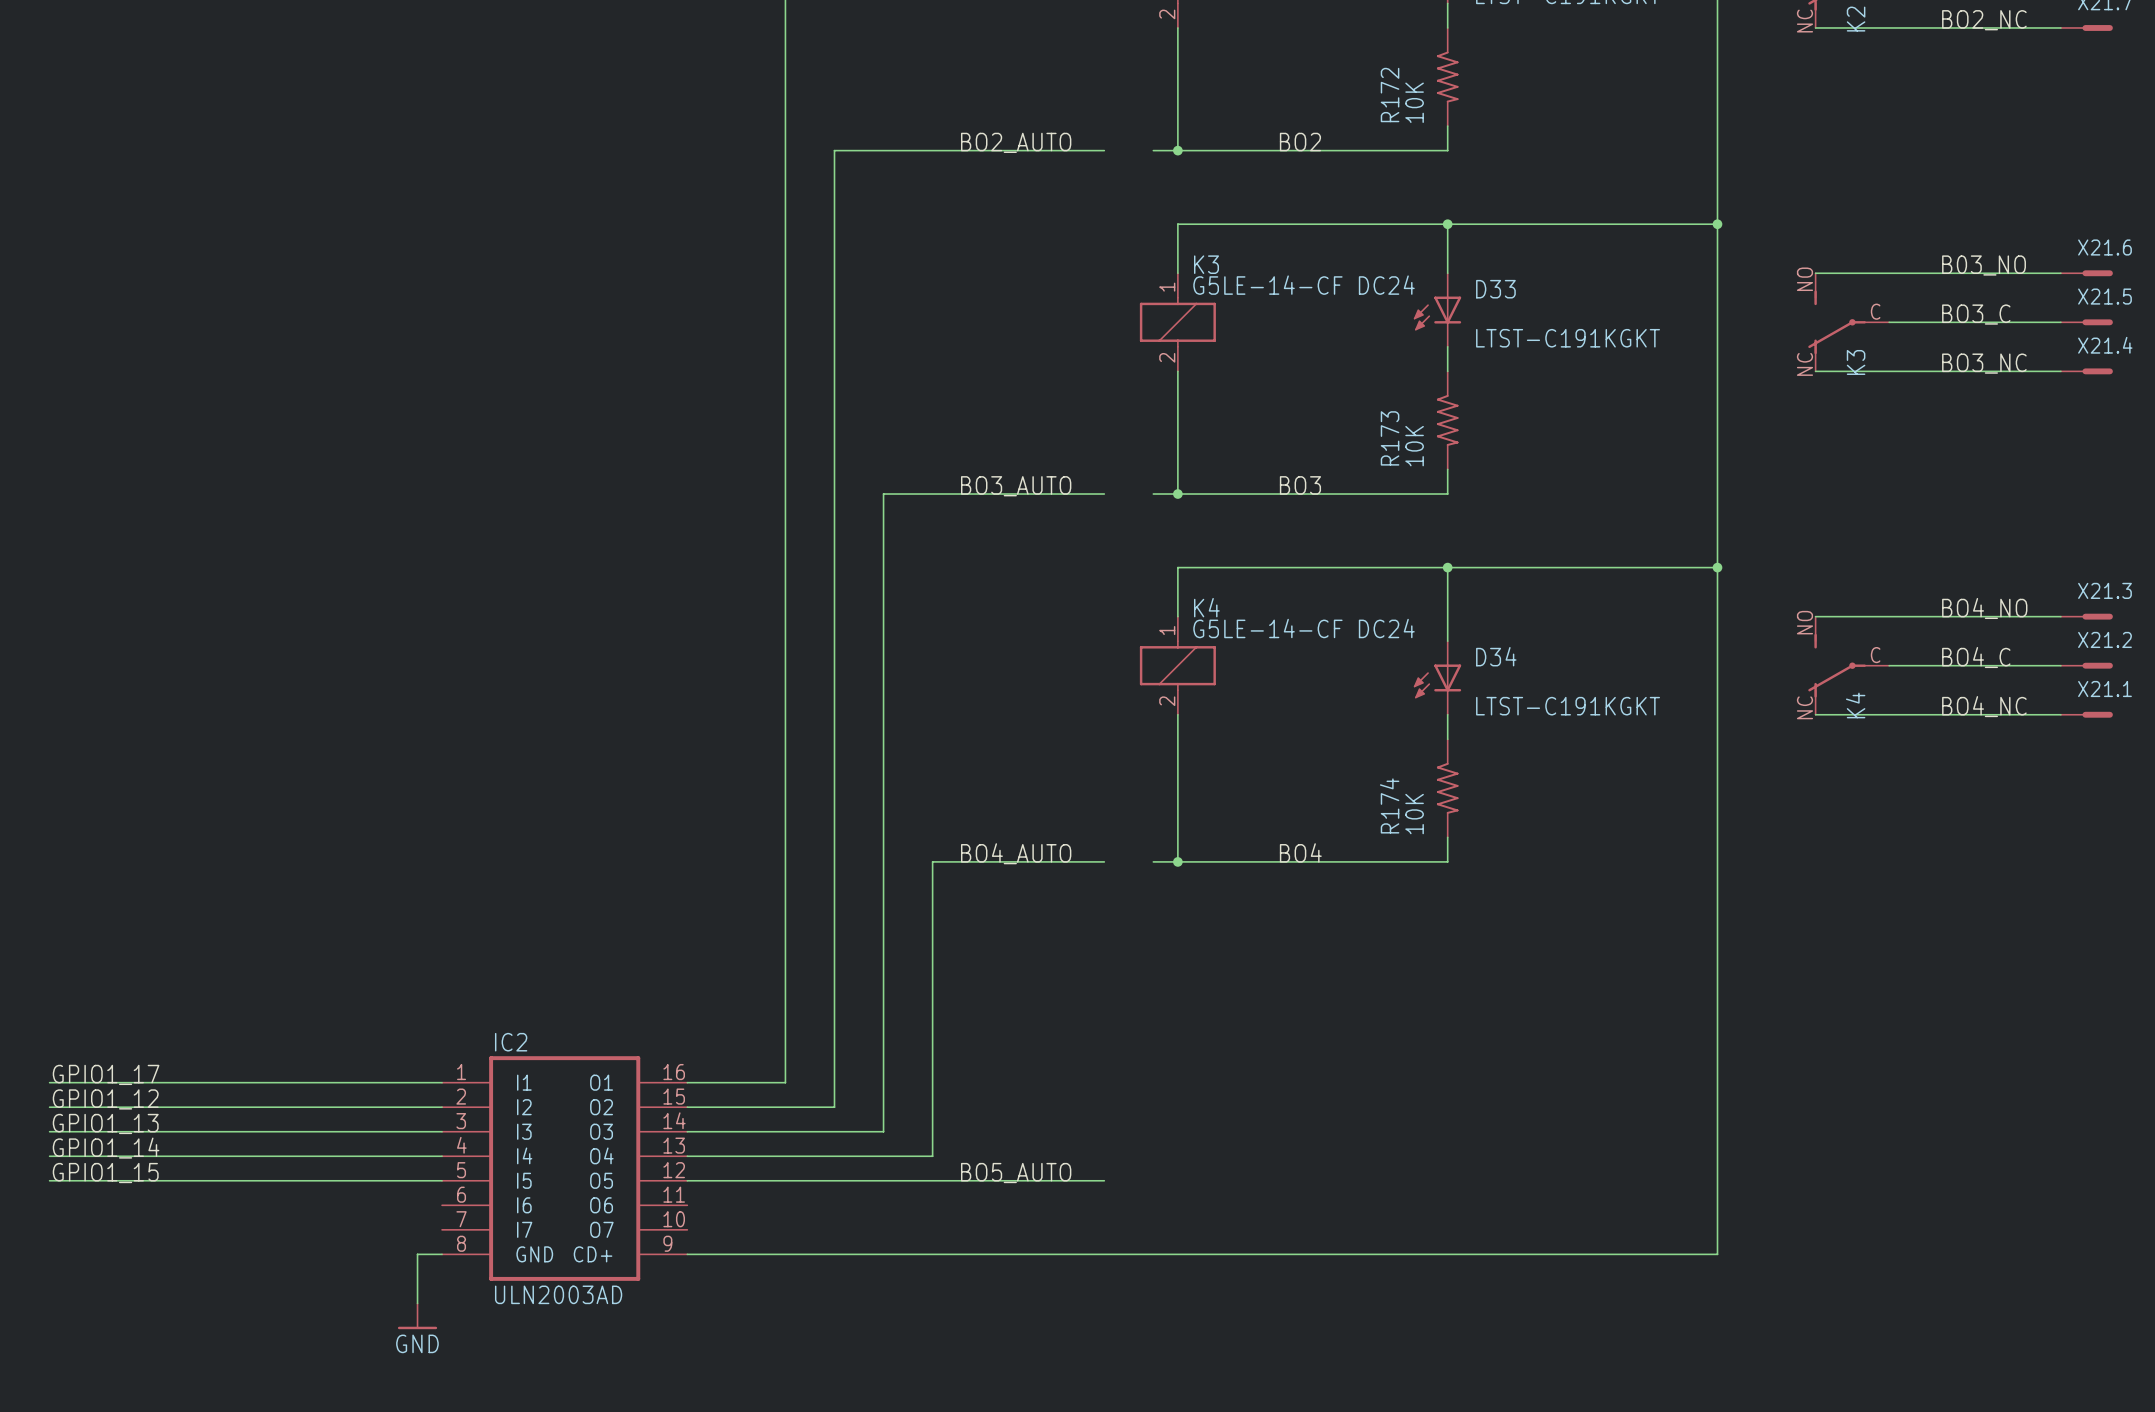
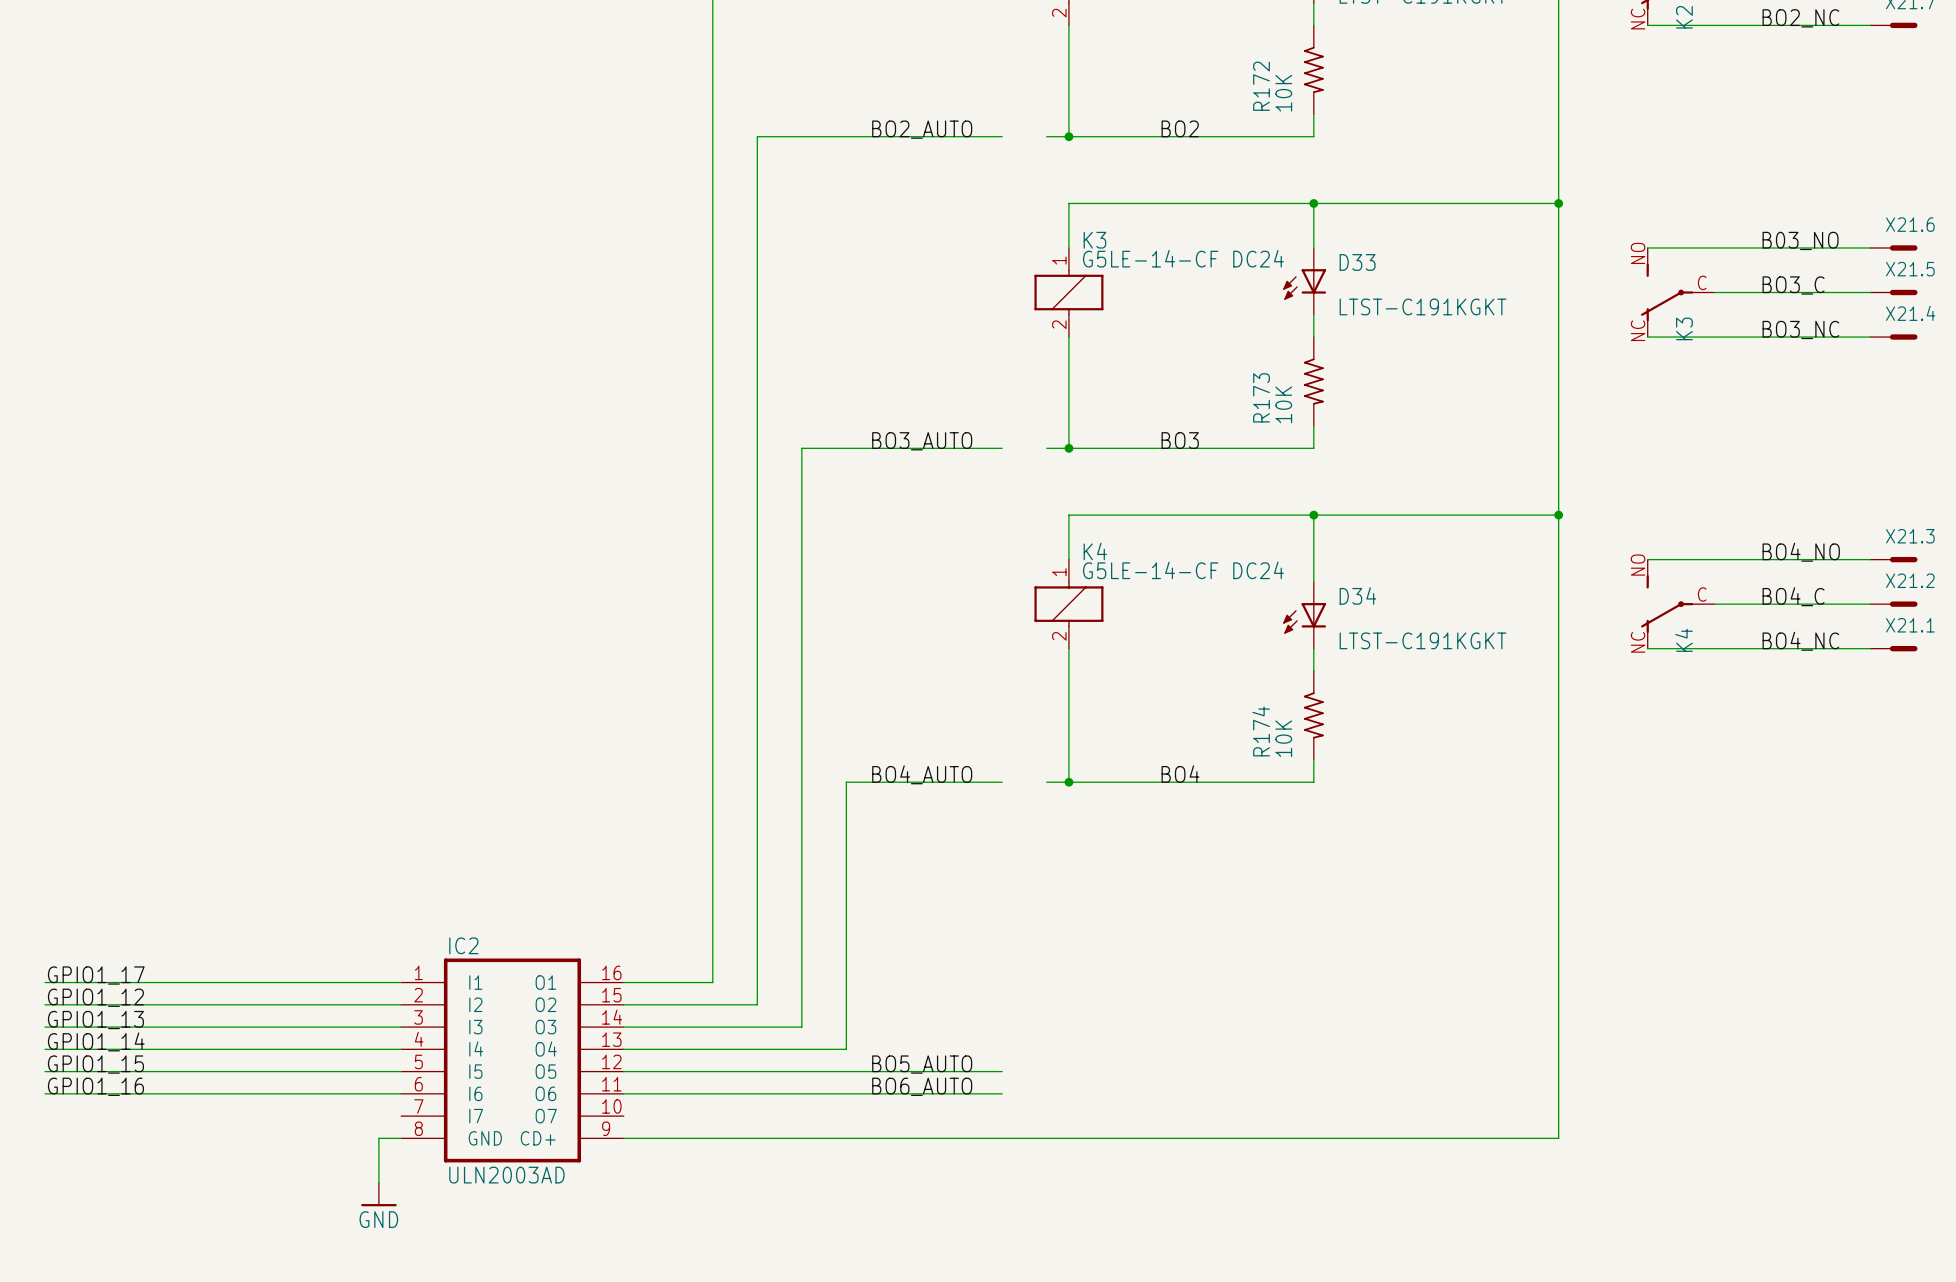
label: none -> GPIO1_16 (95, 1086)
label: none -> BO6_AUTO (922, 1086)
wire: none -> (45, 1093) (401, 1093)
wire: none -> (623, 1093) (1002, 1093)

